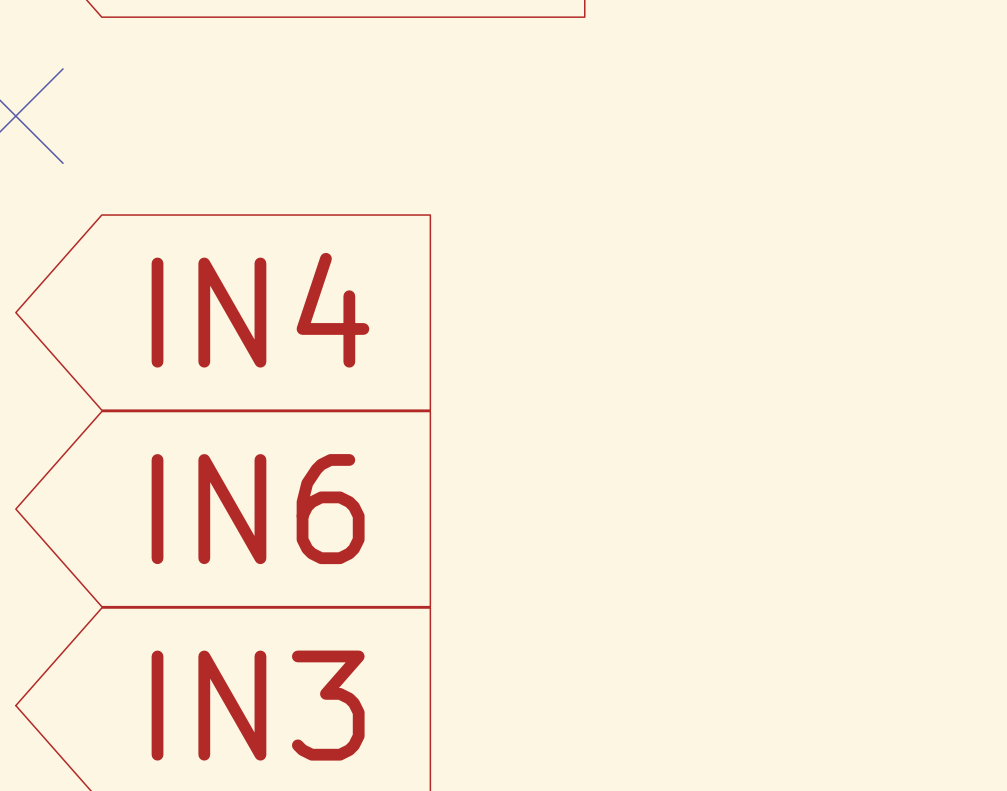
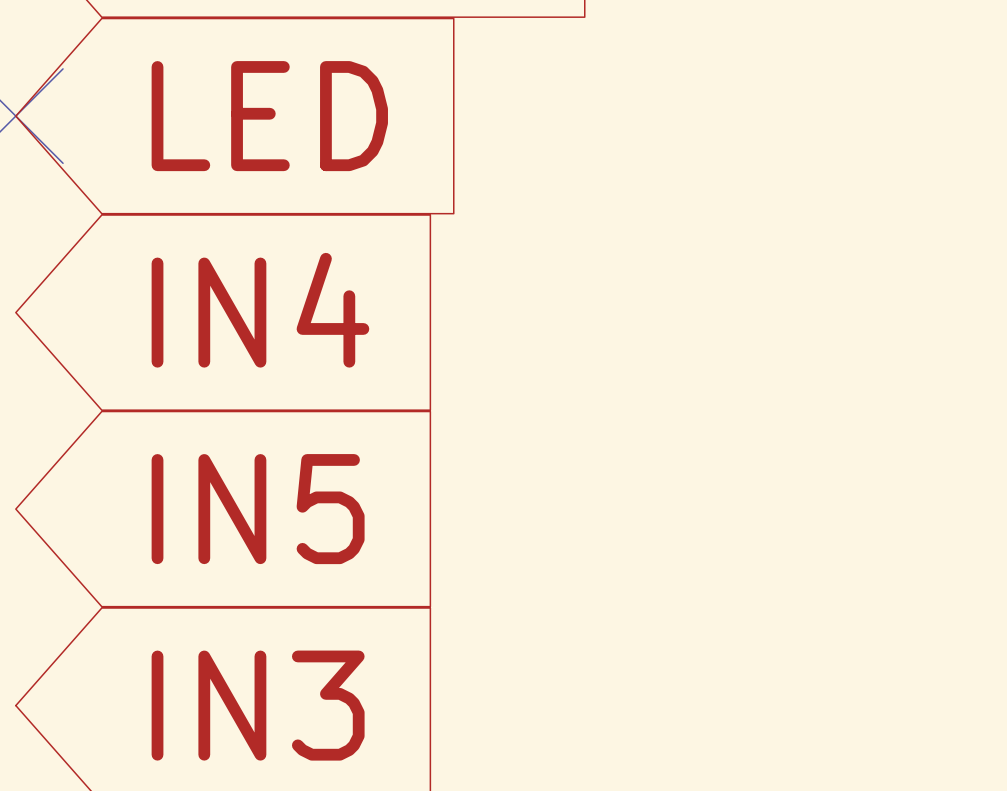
global label: none -> LED (269, 116)
global label: IN6 (258, 509) -> IN5 (258, 509)

